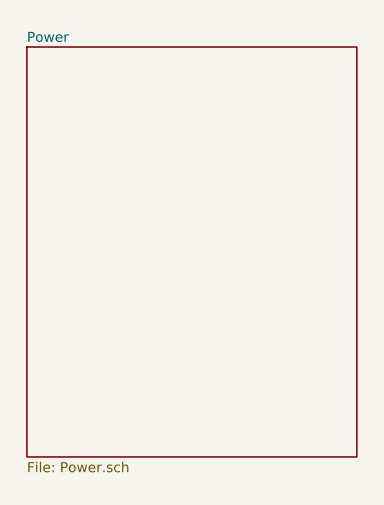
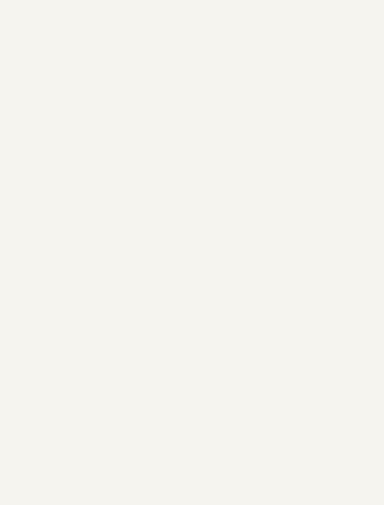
sheet Power: File: Power.sch (191, 251) -> none

